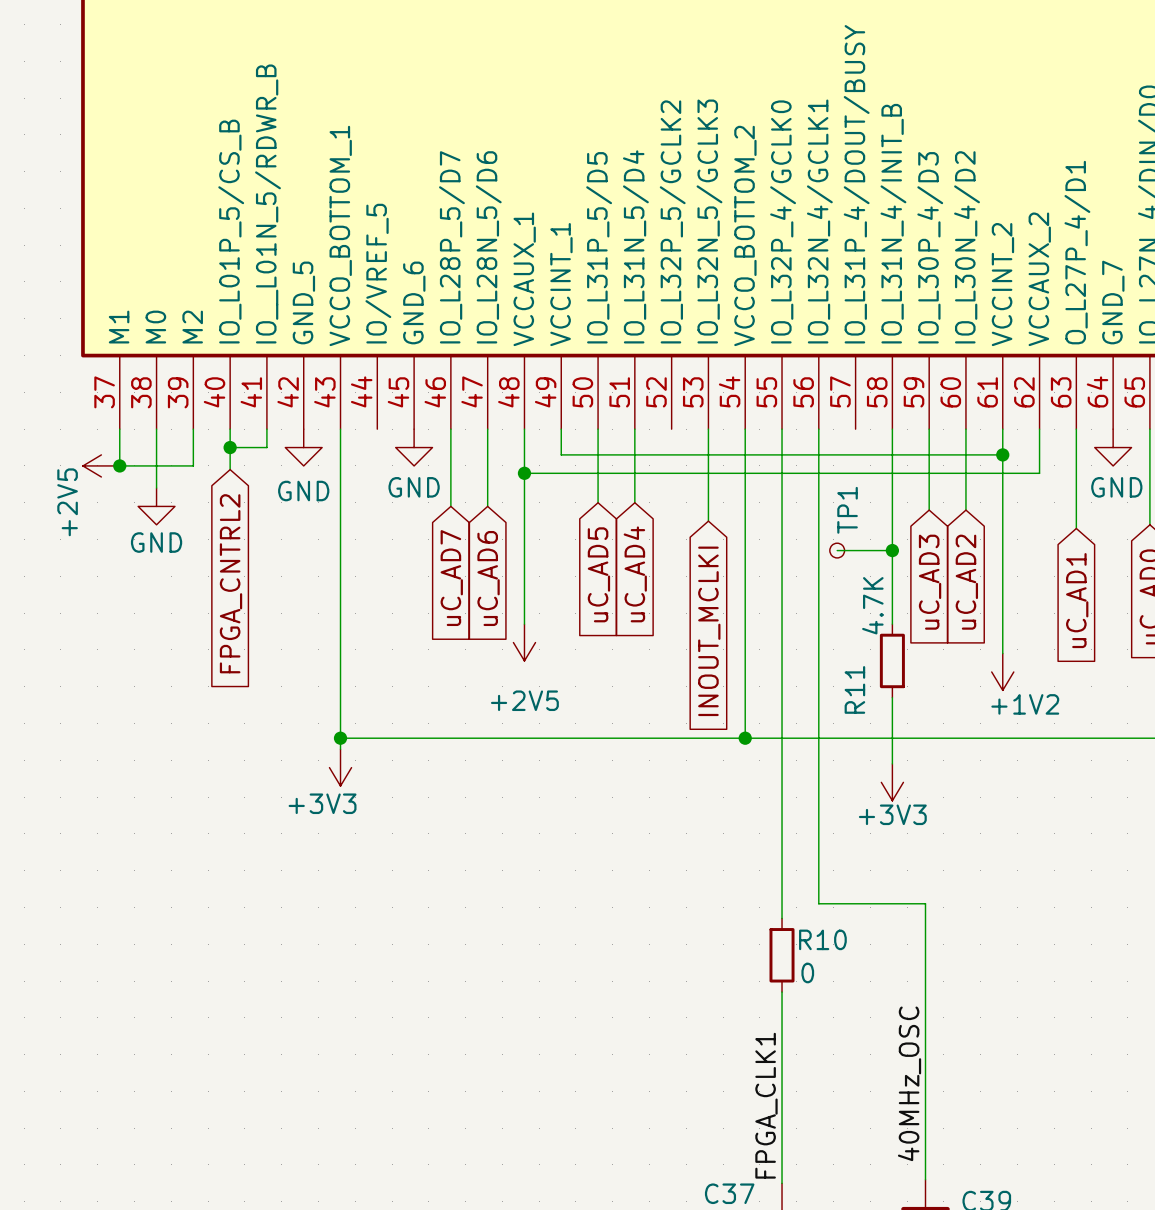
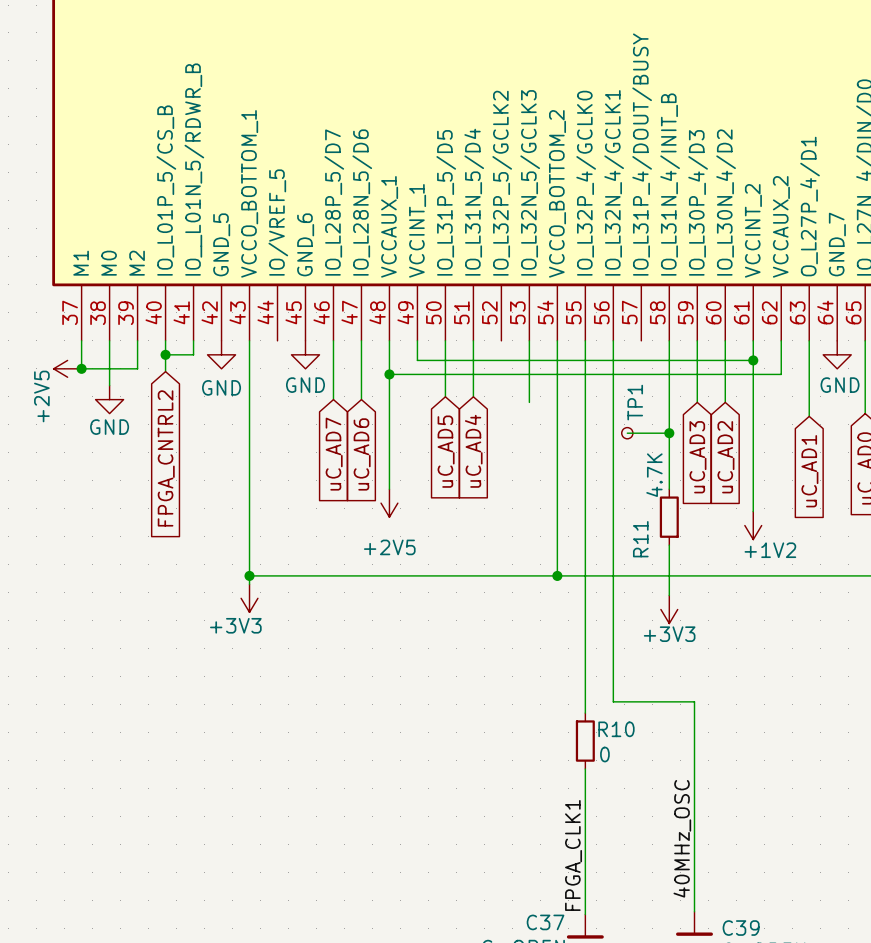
wire: (708, 510) (708, 521) -> none
global label: INOUT_MCLKI (709, 631) -> none

